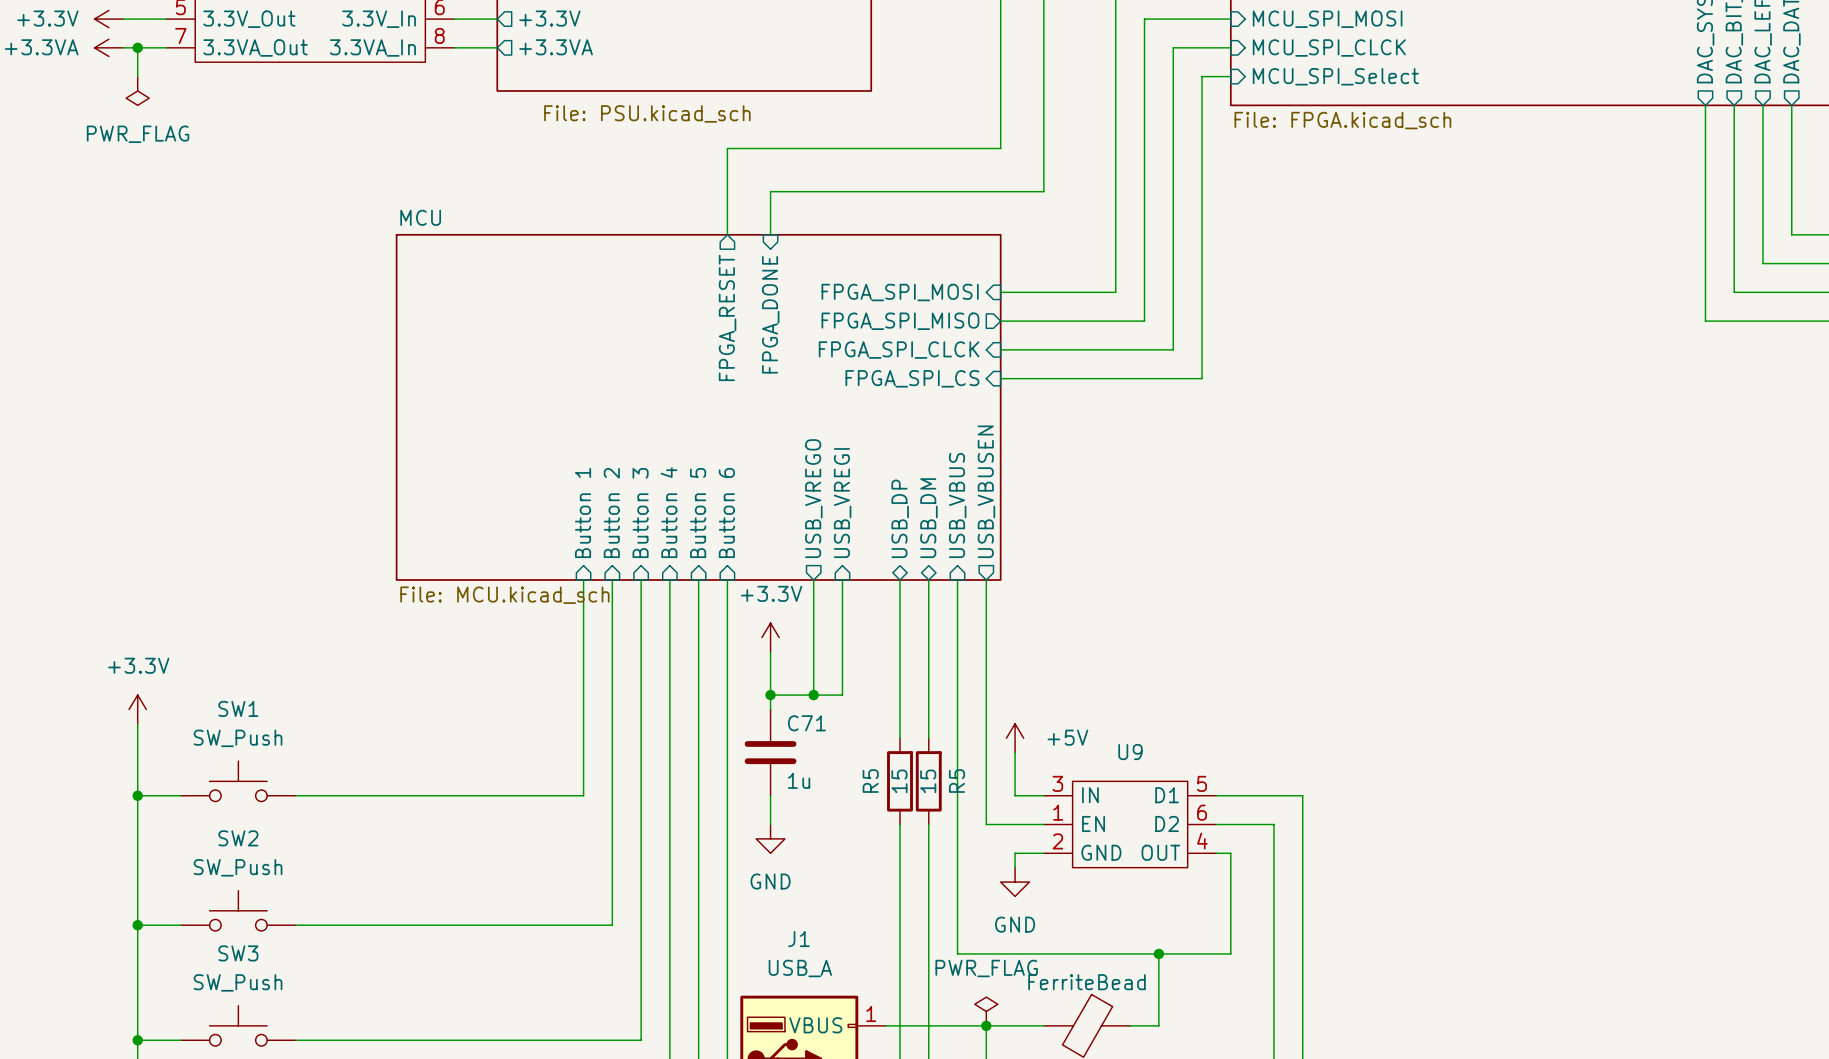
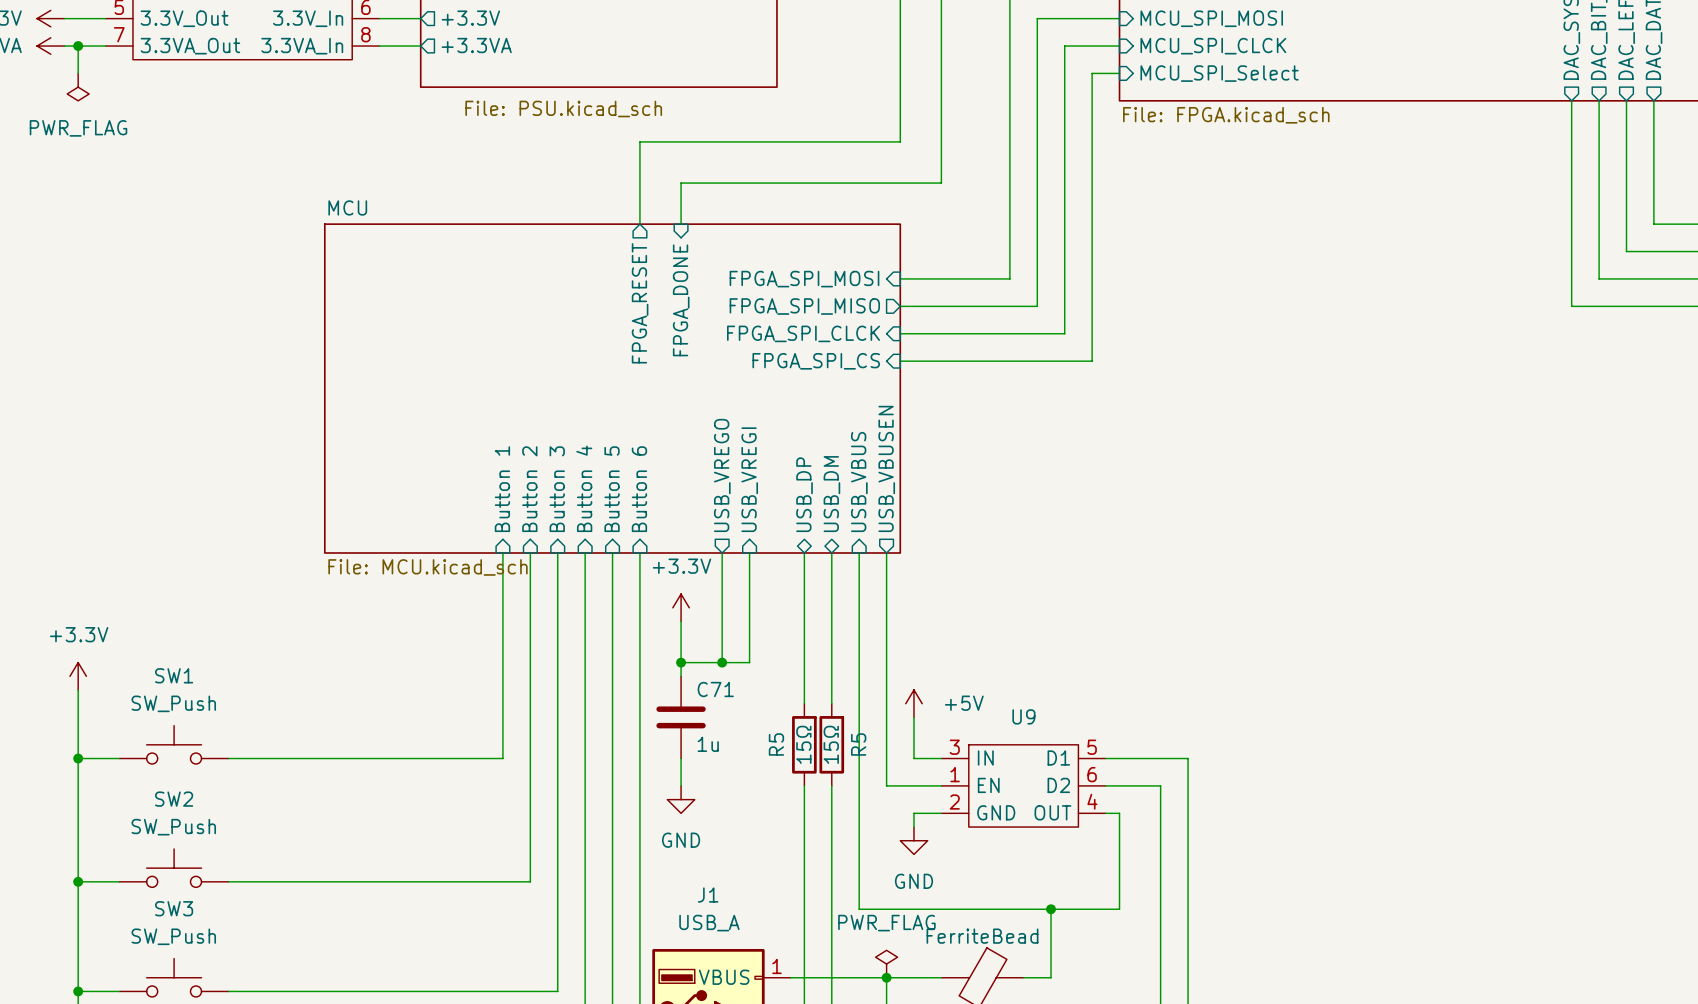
R5 value: 15 (899, 781) -> 15Ω (803, 744)
R5 value: 15 (928, 781) -> 15Ω (831, 744)

